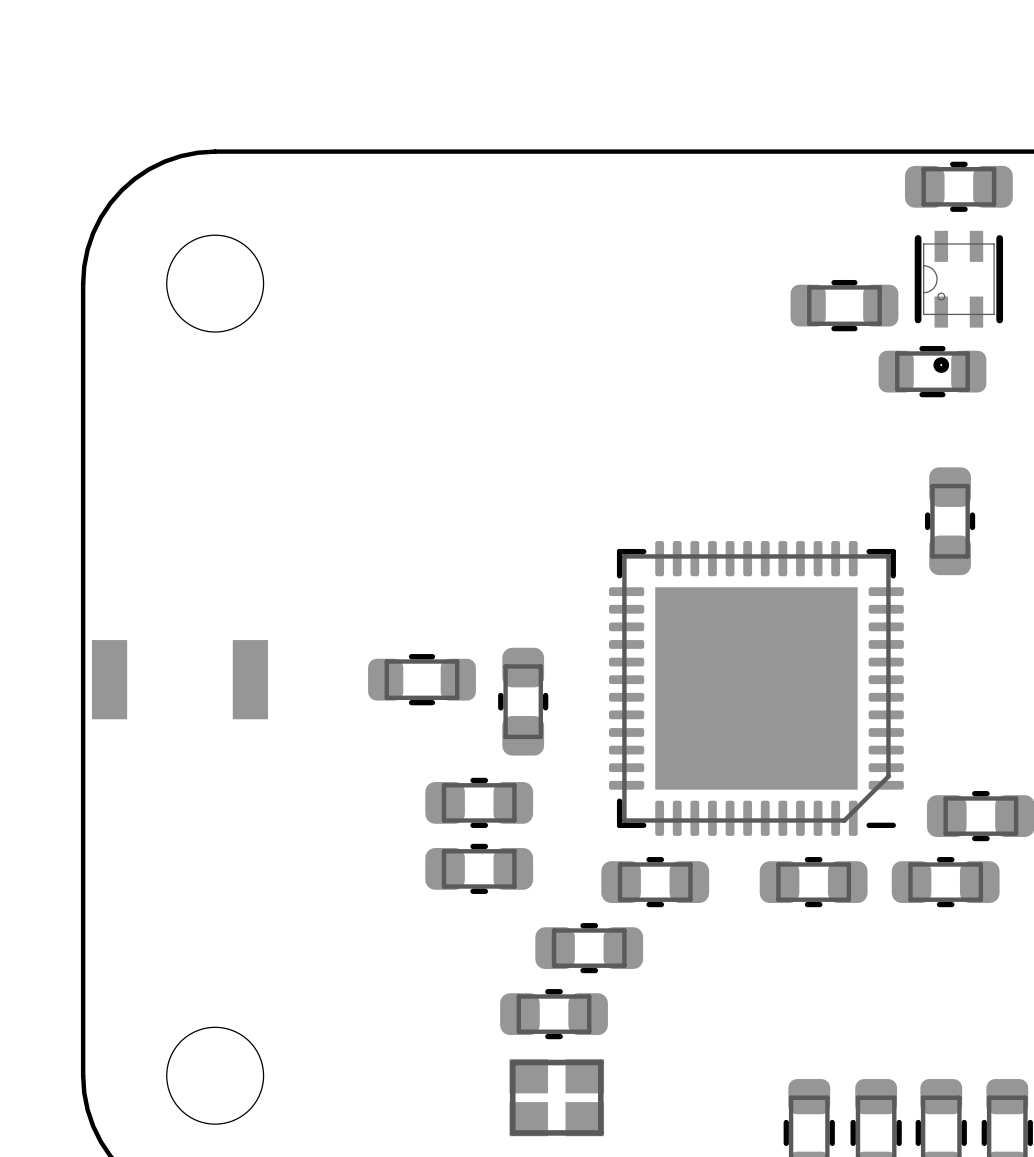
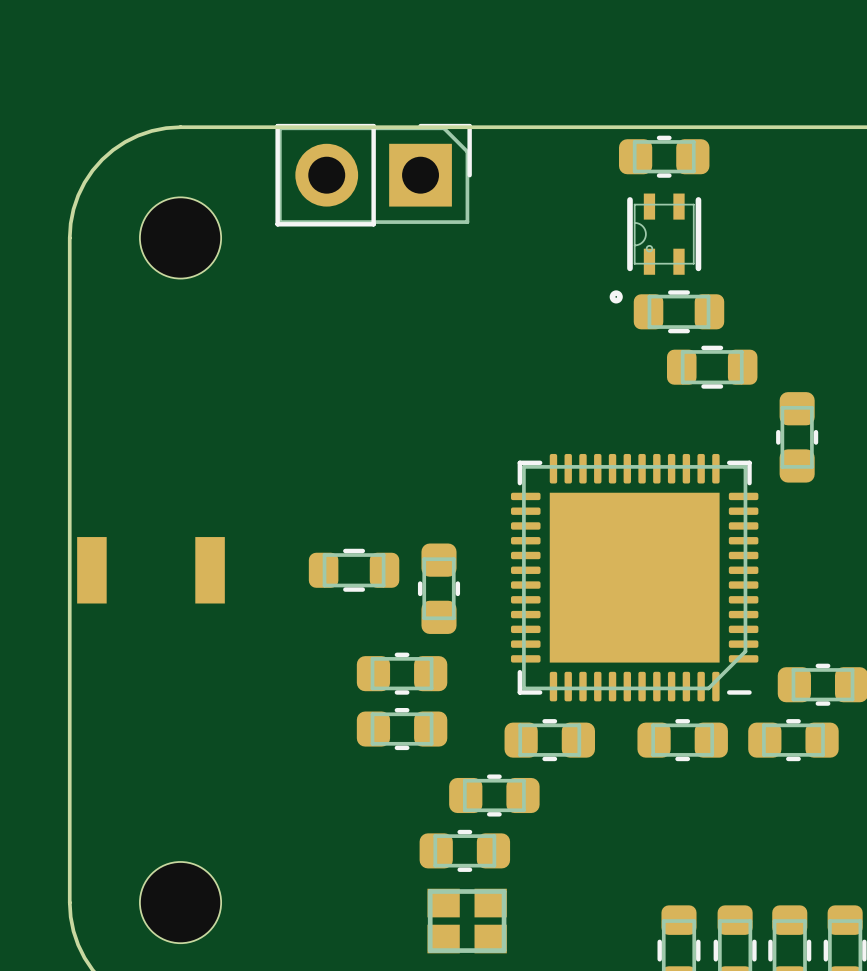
part position: (958, 186) -> (664, 156)
part: none -> (373, 175)
part: none -> (655, 248)
part: (958, 301) -> none
part: (844, 305) -> none
part: none -> (678, 311)
part: (932, 371) -> none
part: none -> (712, 367)

